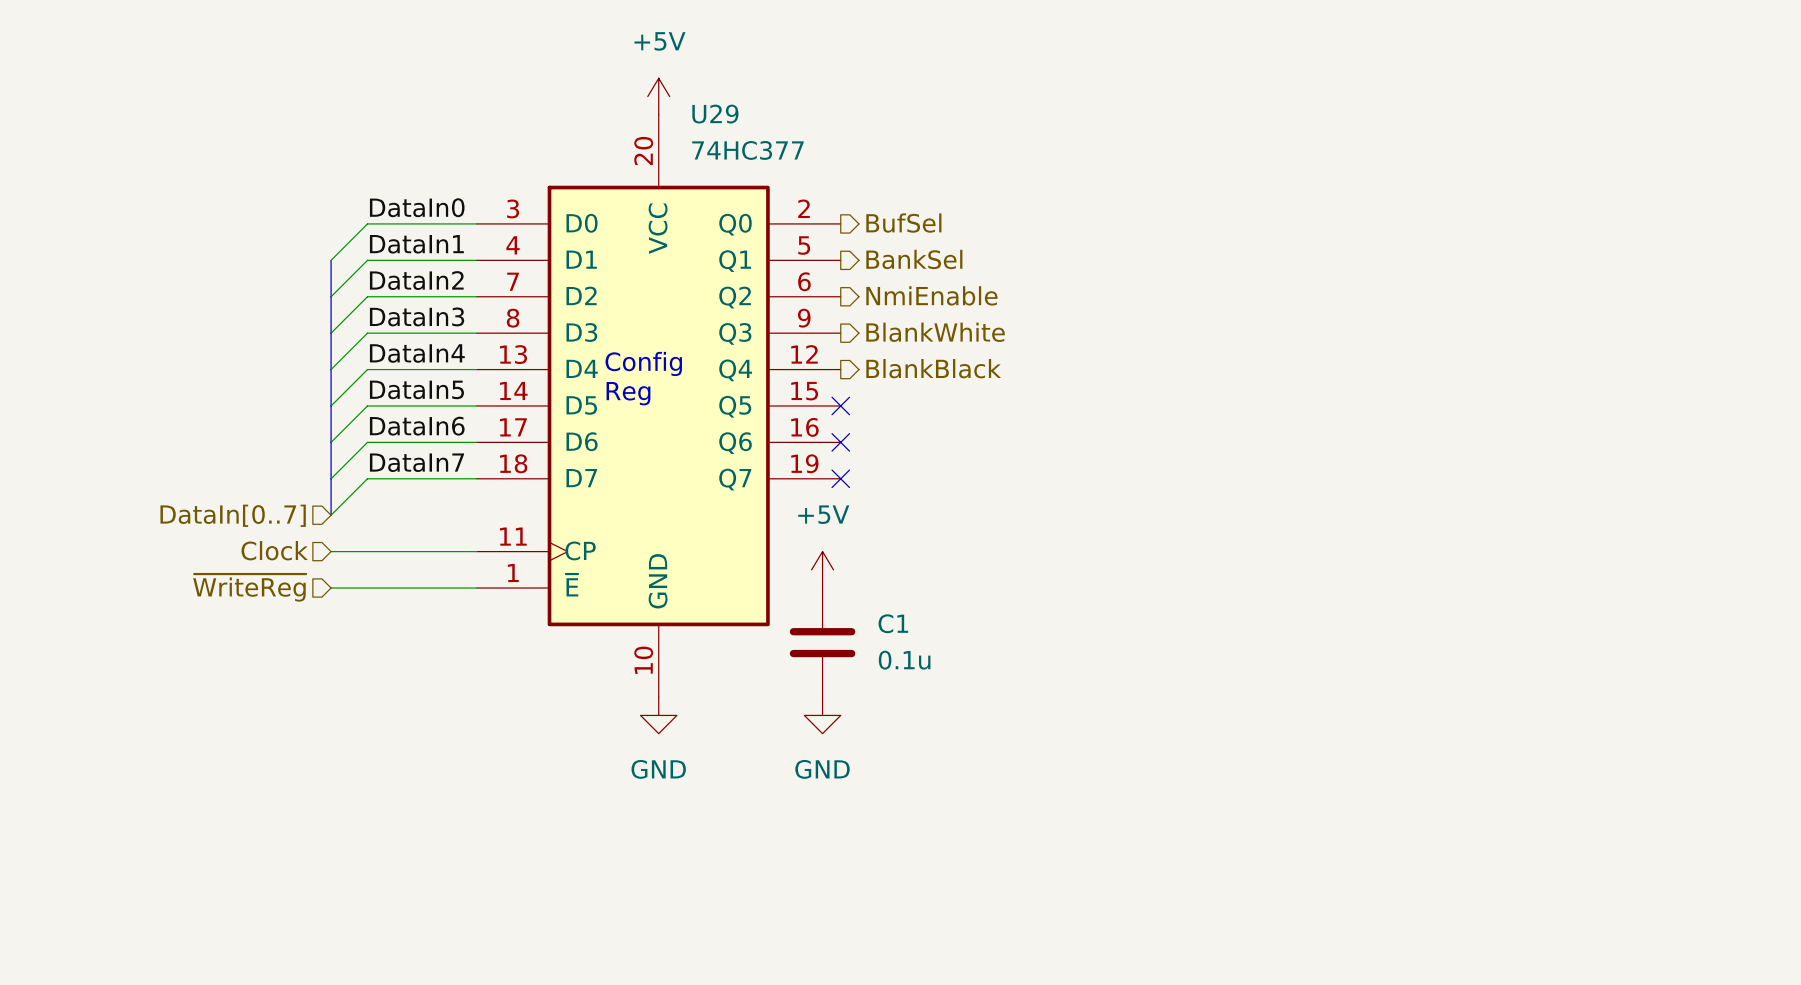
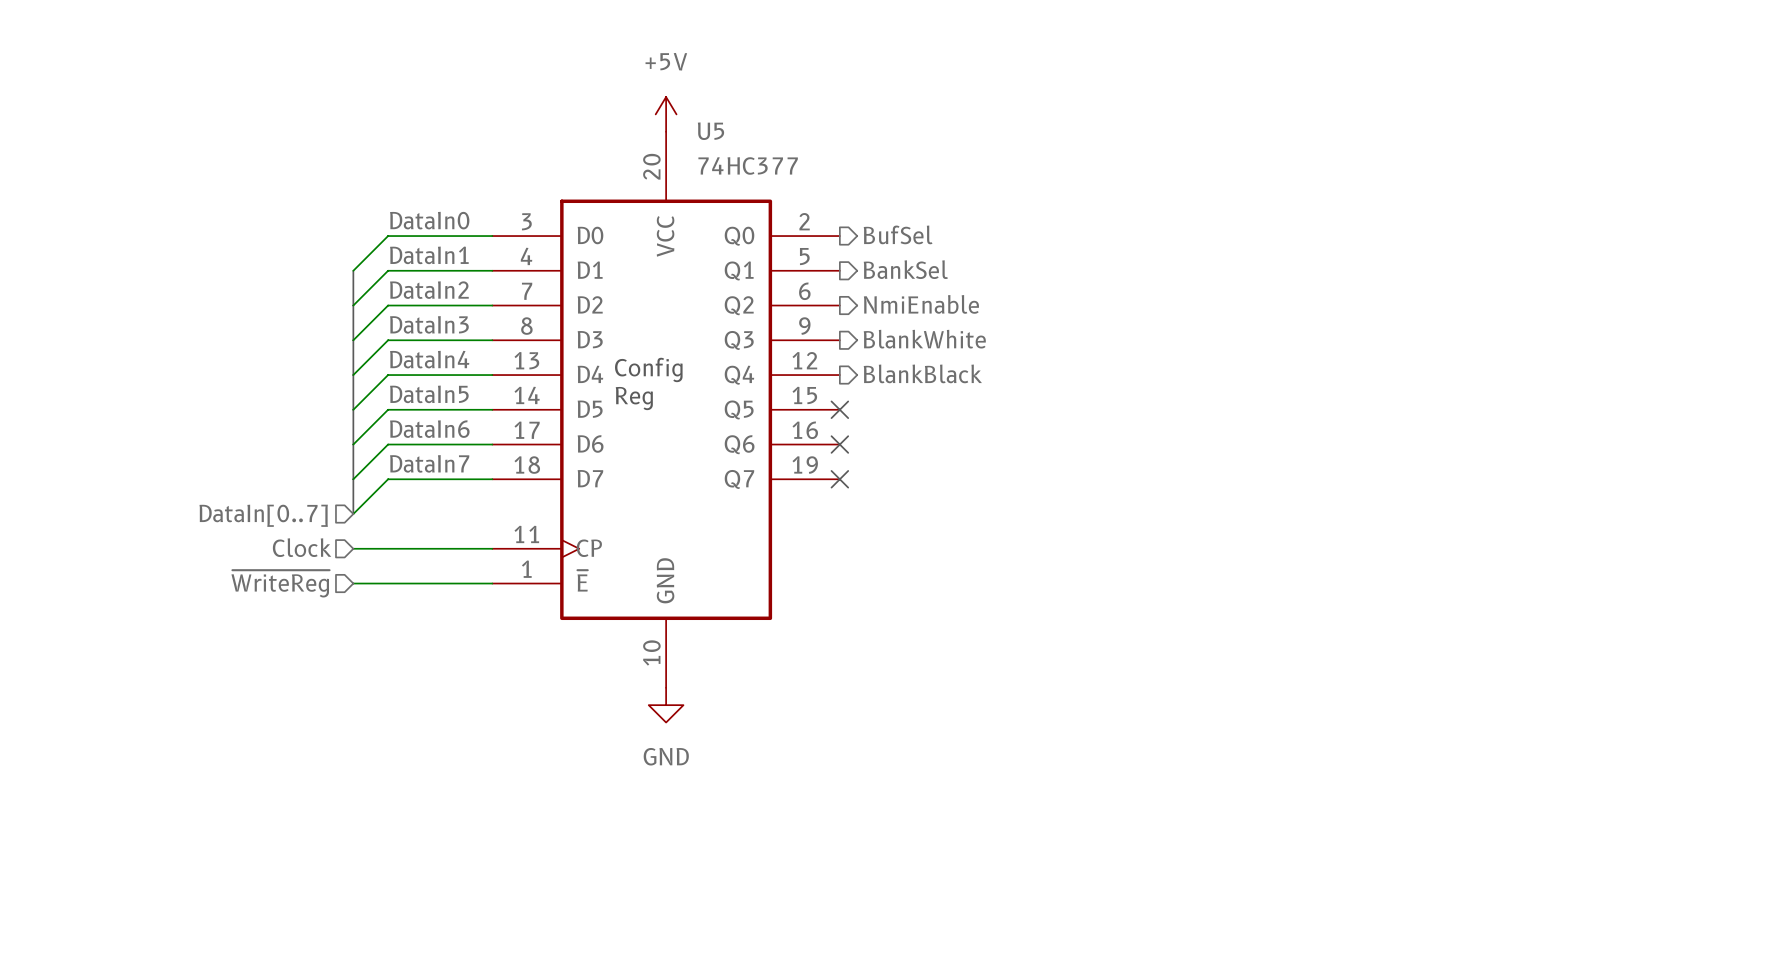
U29 name: U29 (715, 114) -> U5 (710, 131)
power symbol: +5V (822, 569) -> none
C1: 0.1u (822, 642) -> none
power symbol: GND (822, 715) -> none

